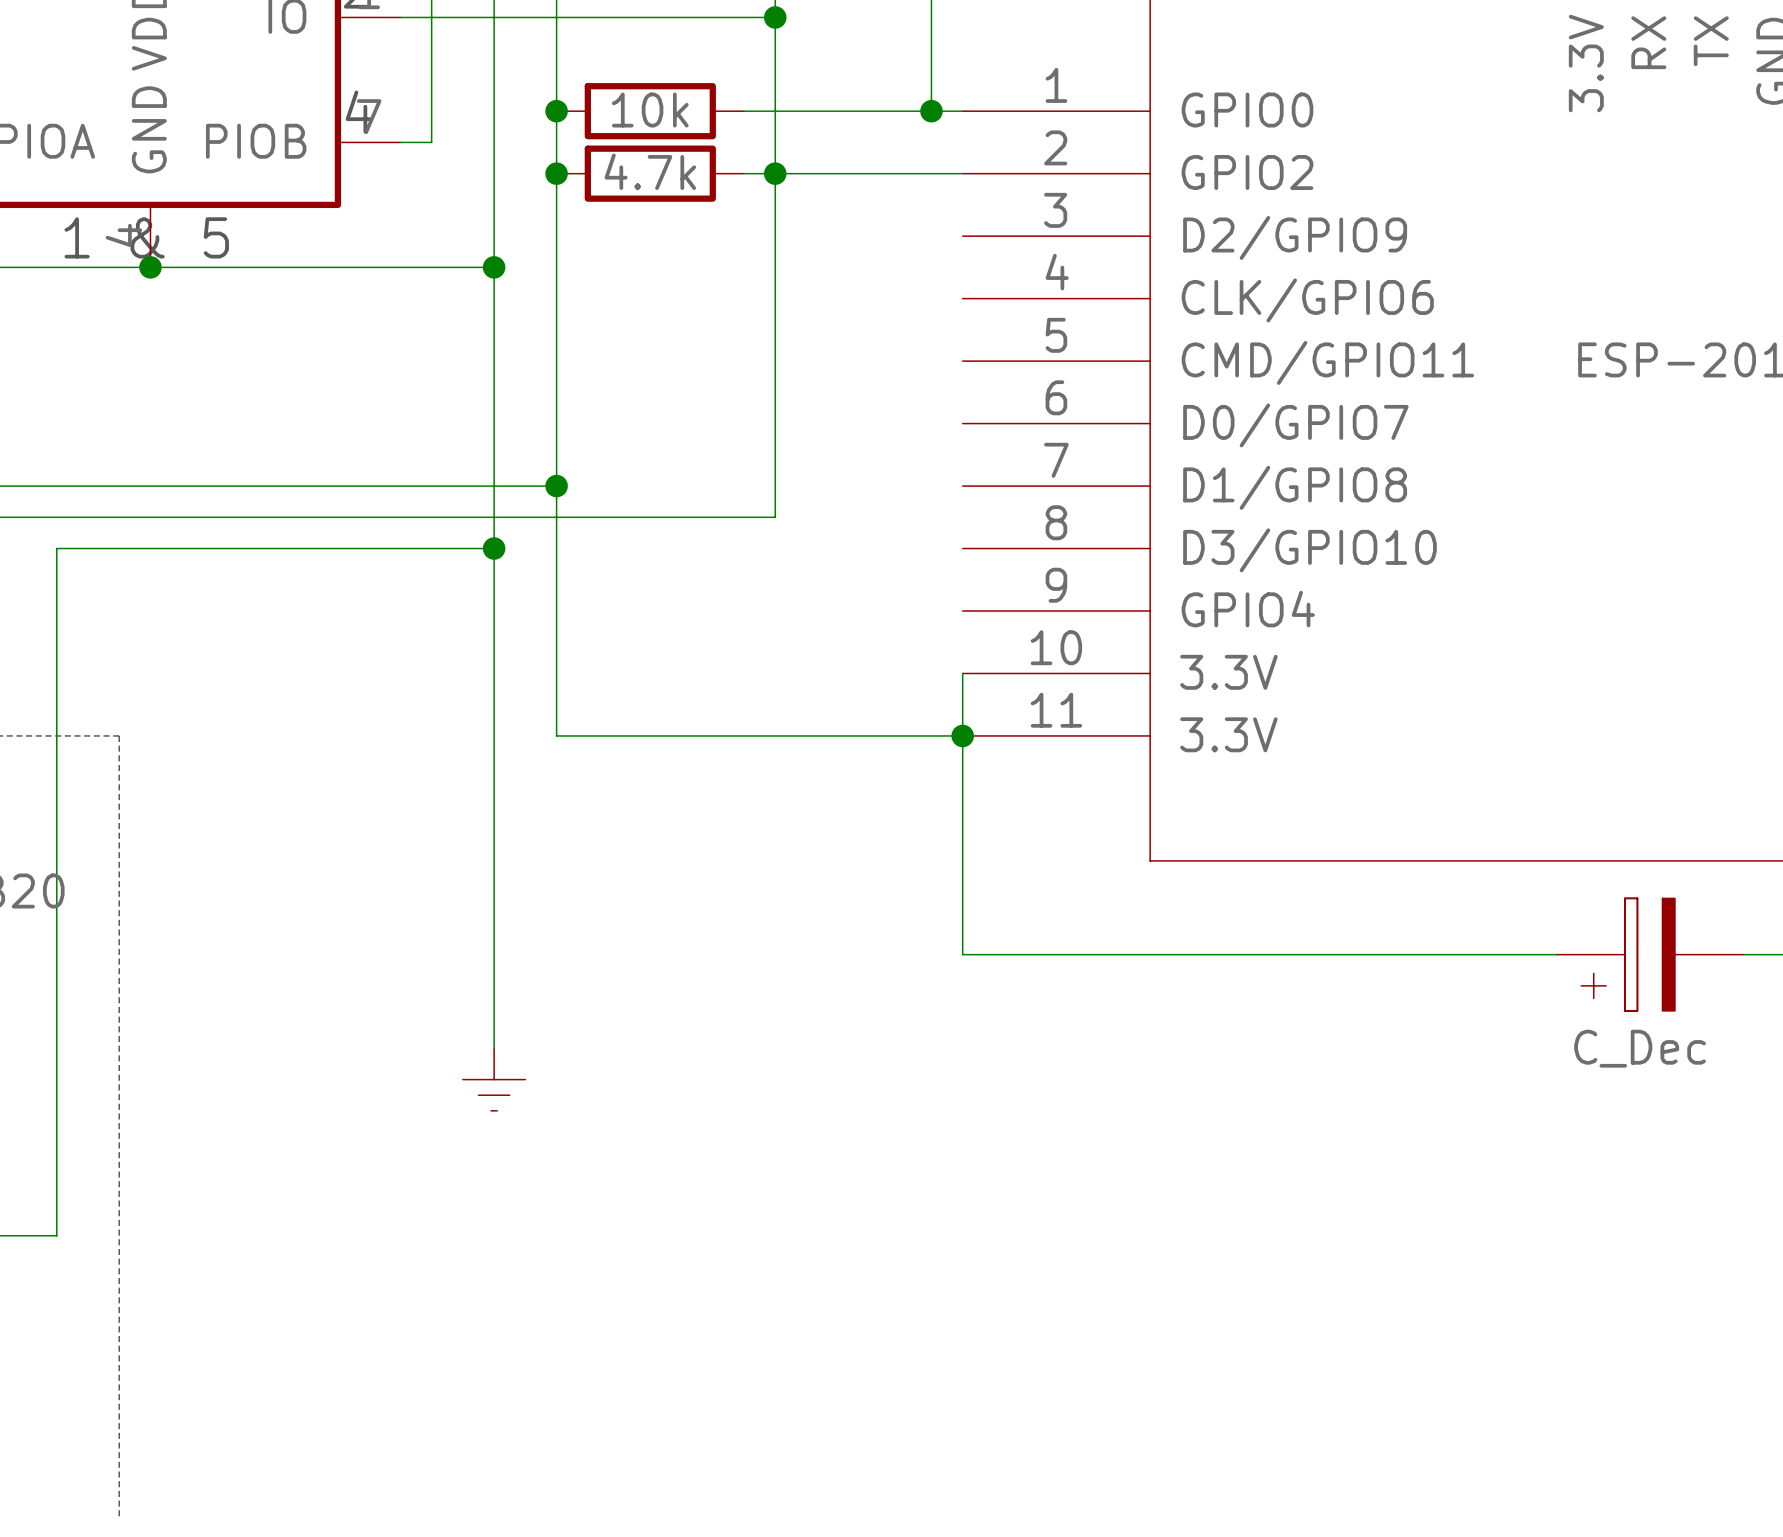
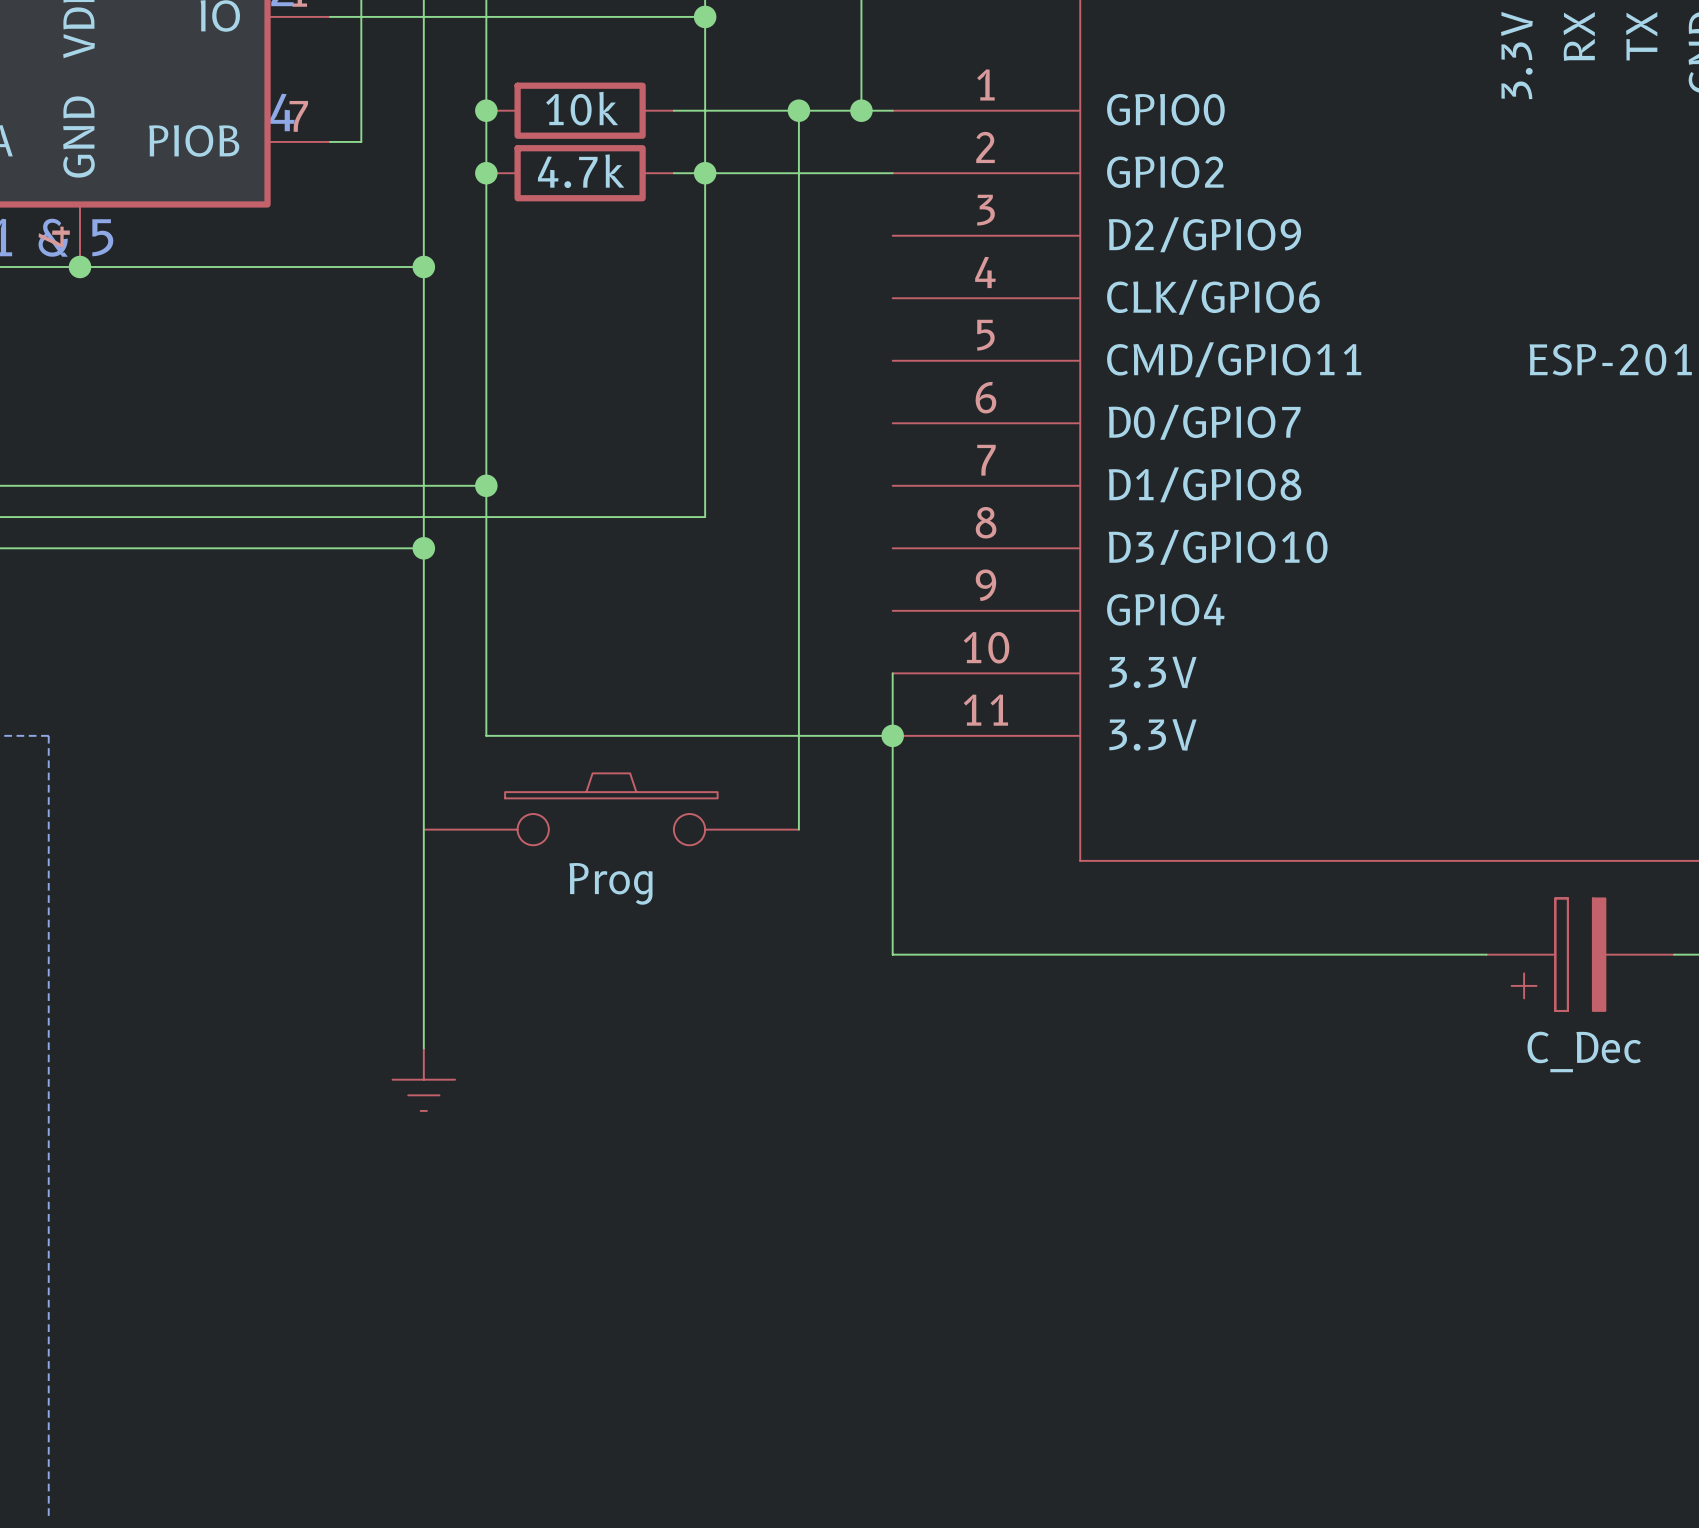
wire: none -> (798, 110) (798, 829)
junction: none -> (798, 110)
part: none -> Prog (611, 809)

